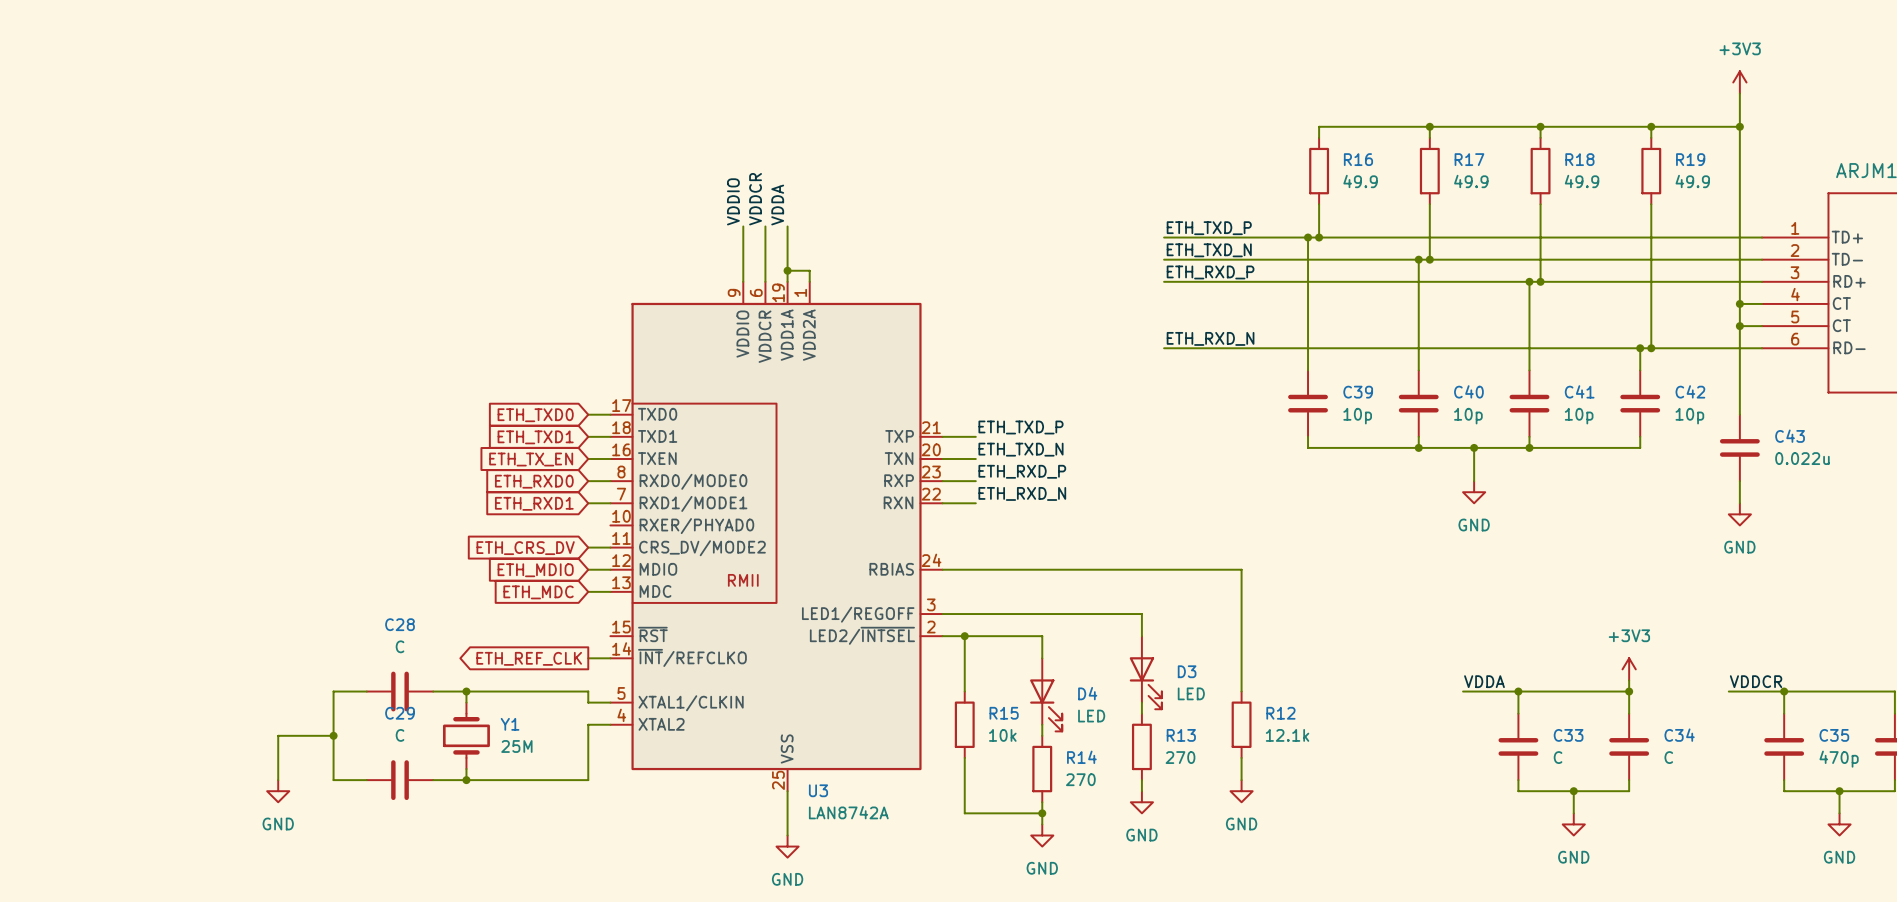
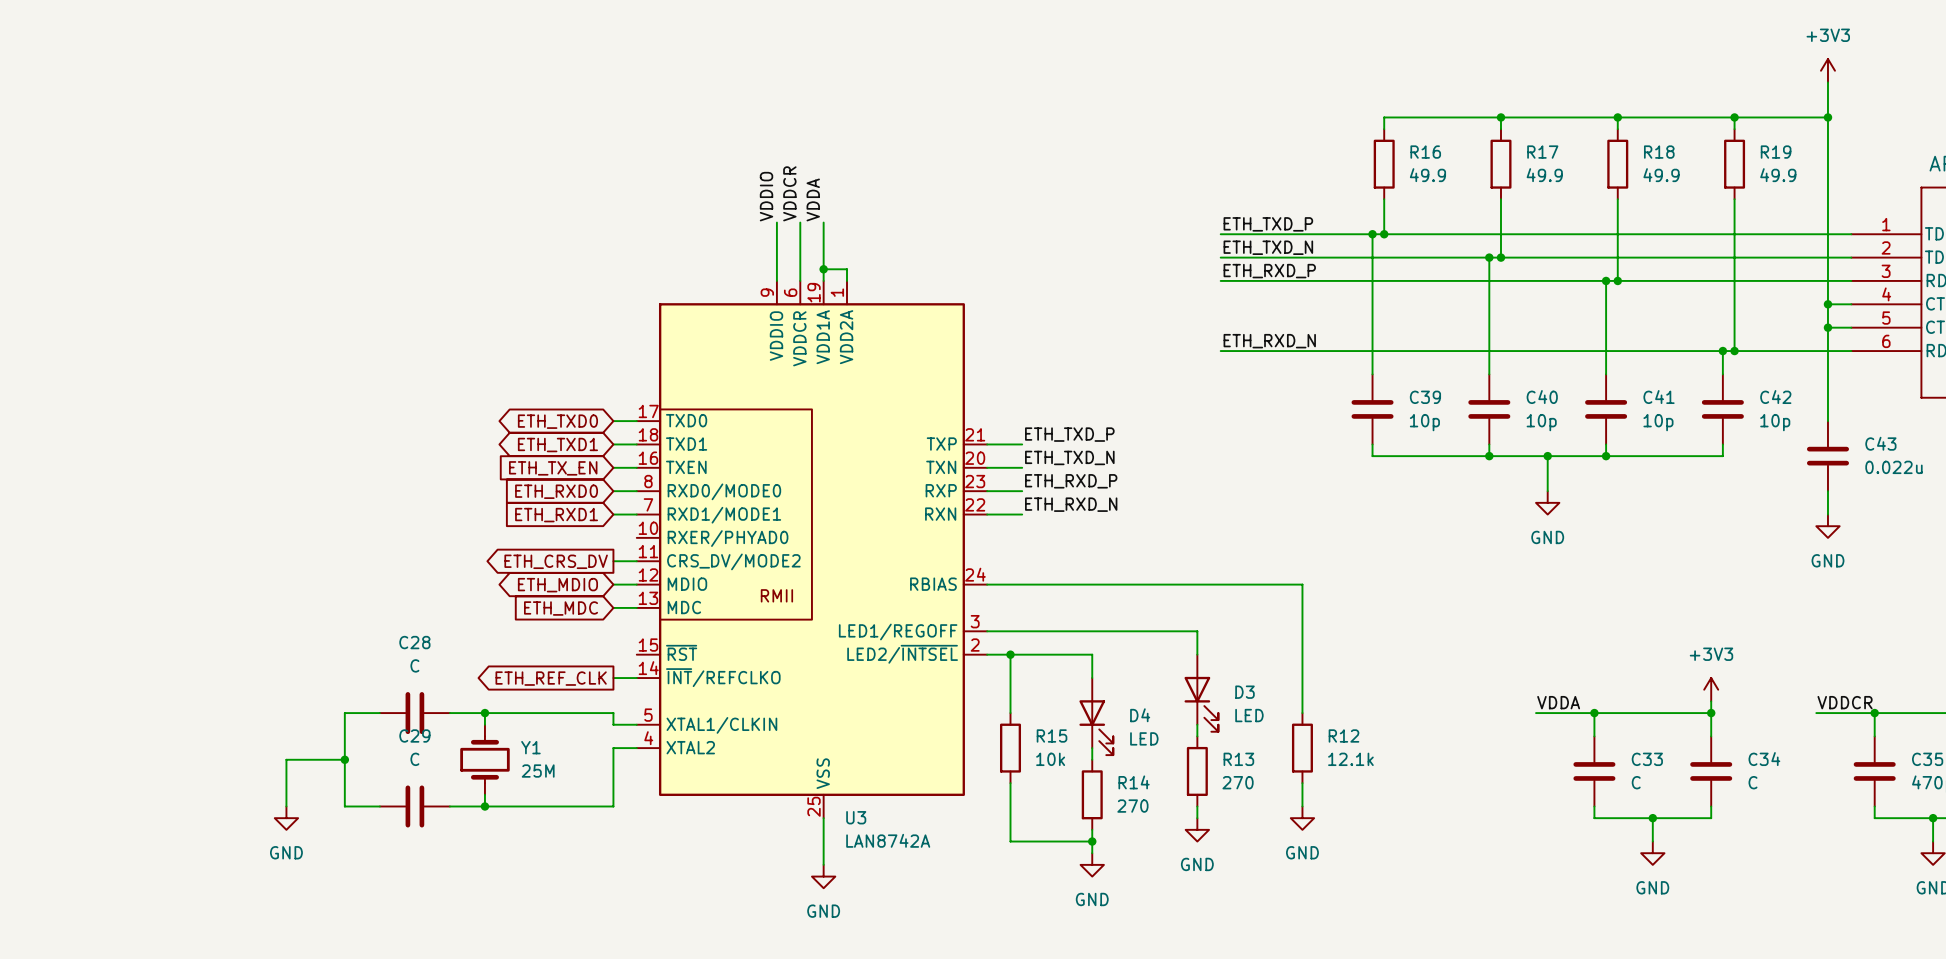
global label shape: input (535, 415) -> bidirectional (557, 421)
global label shape: input (535, 437) -> bidirectional (557, 445)
global label shape: input (525, 548) -> output (556, 561)
global label shape: input (535, 570) -> bidirectional (557, 585)

